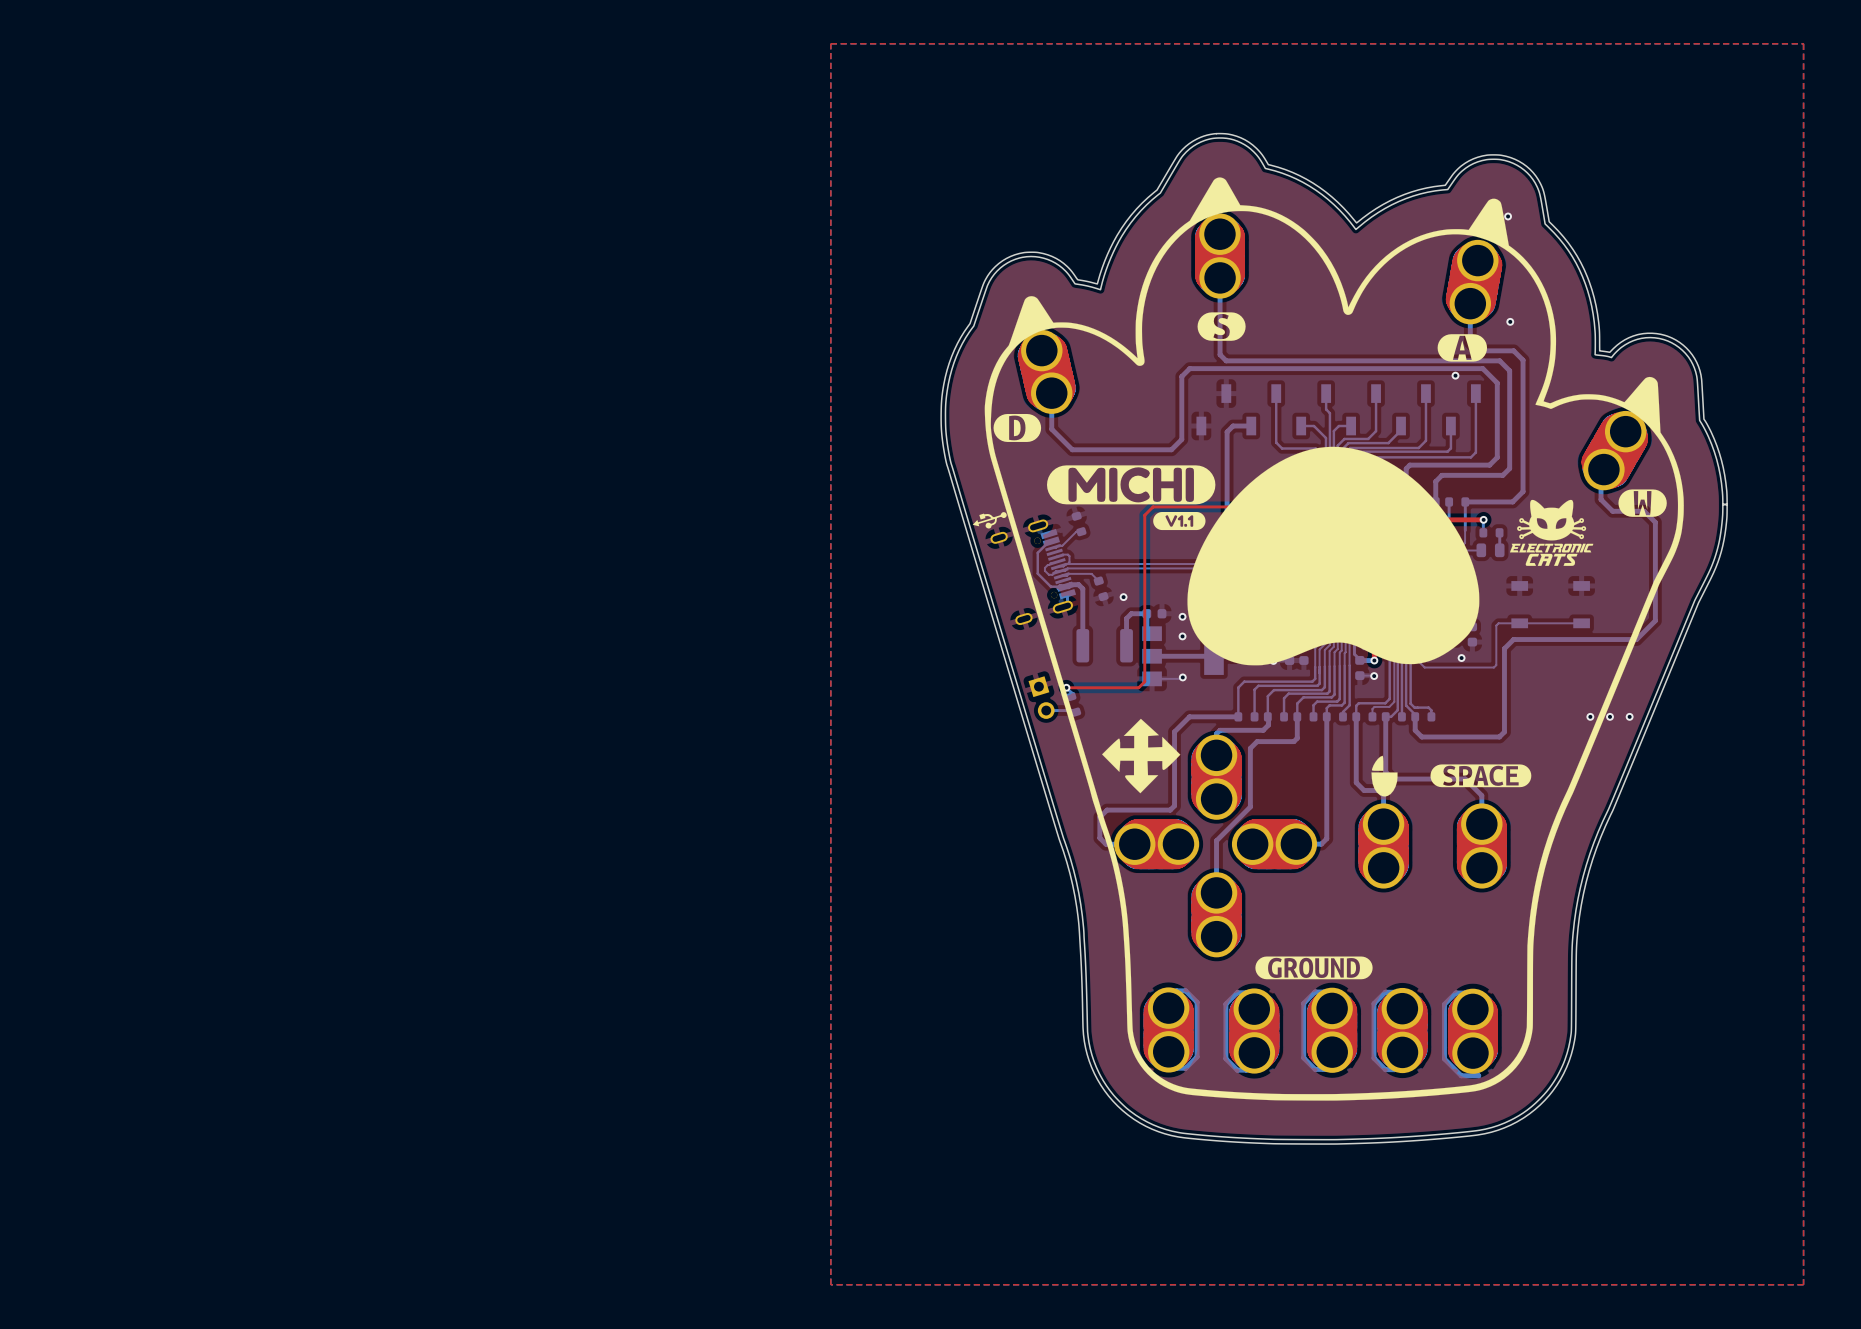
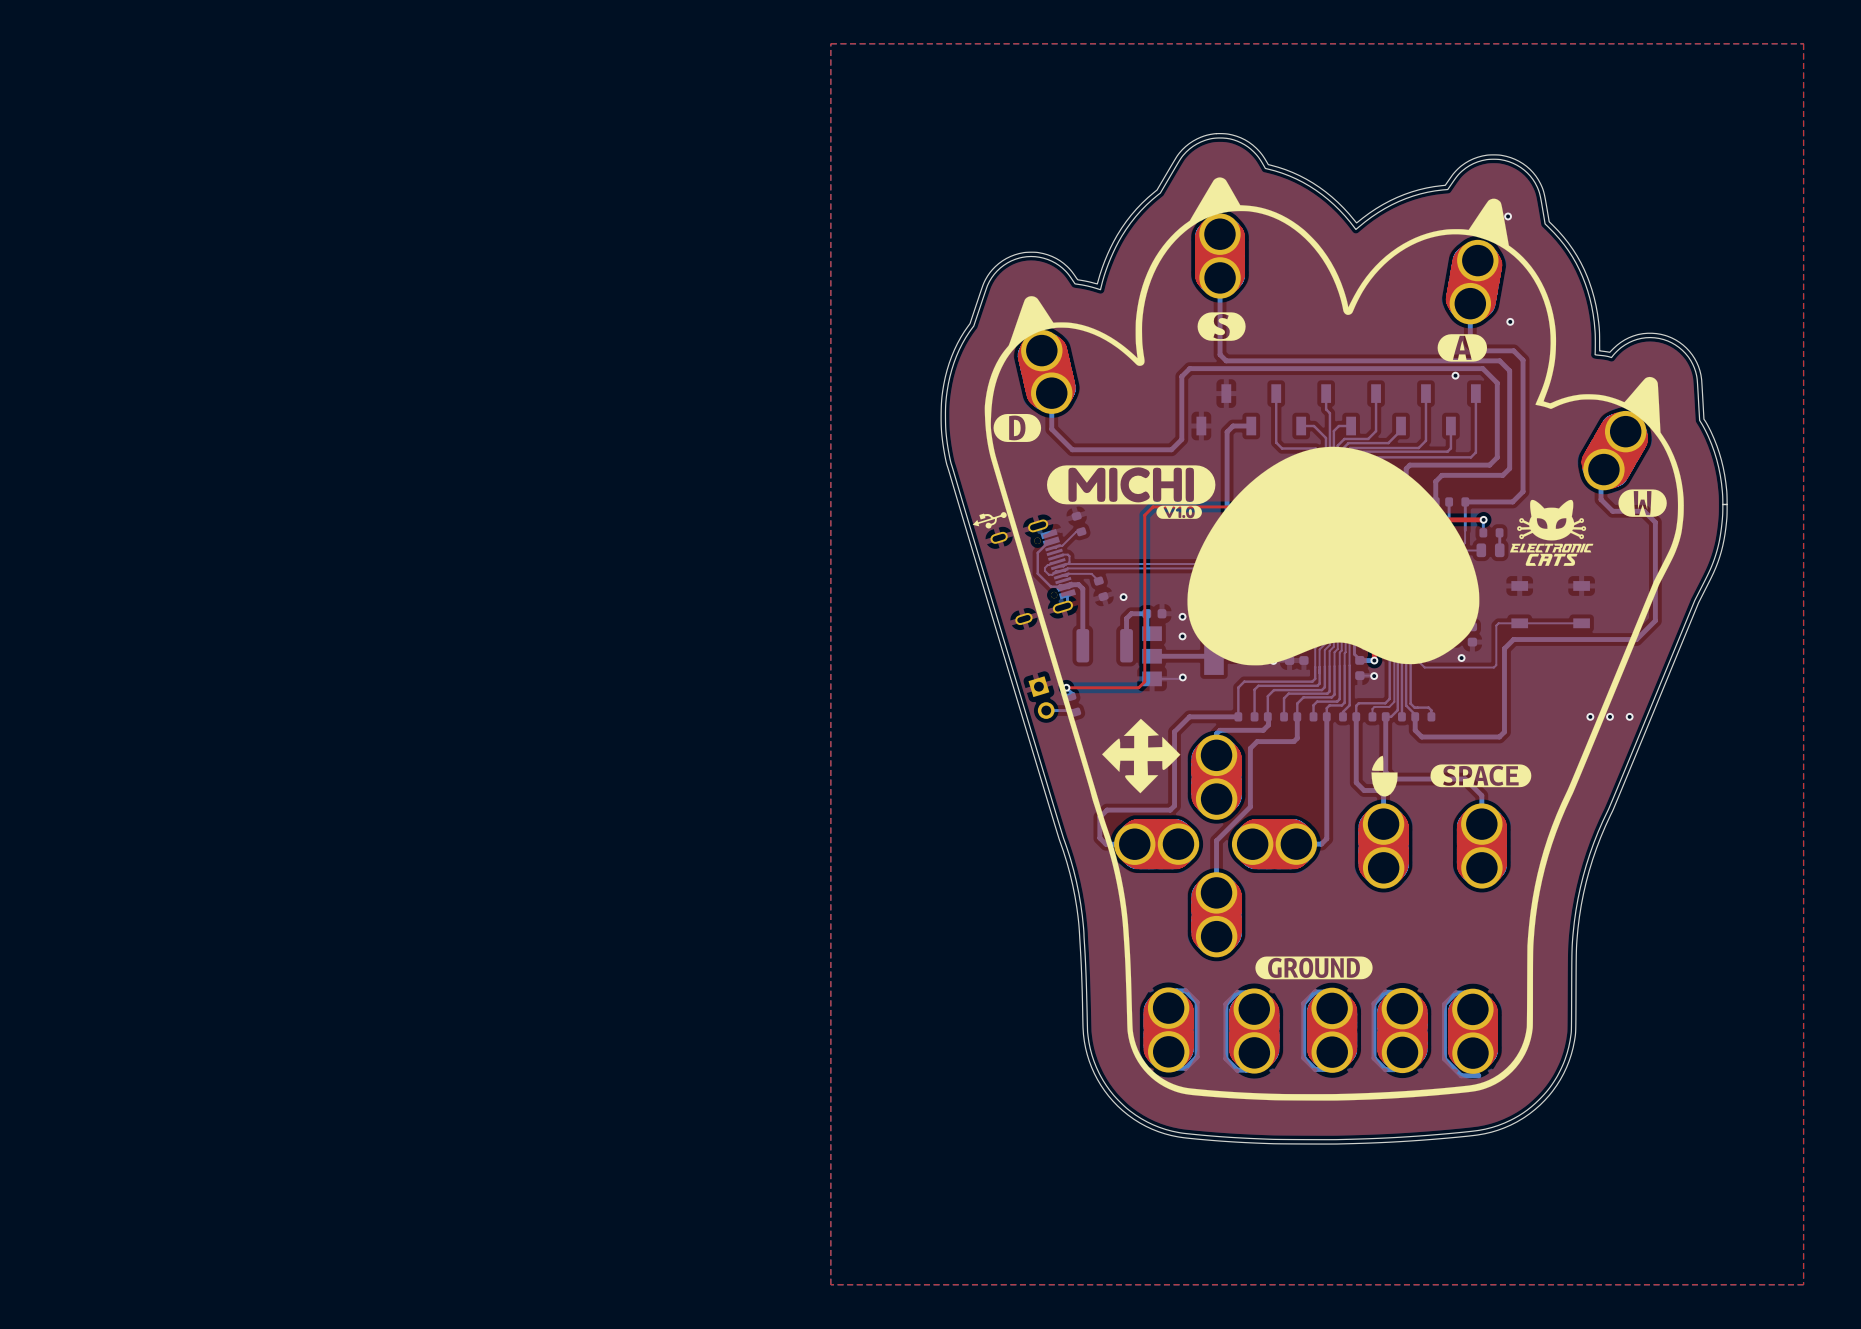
drawing shape: [1153, 511, 1206, 531] -> [1156, 505, 1202, 519]

